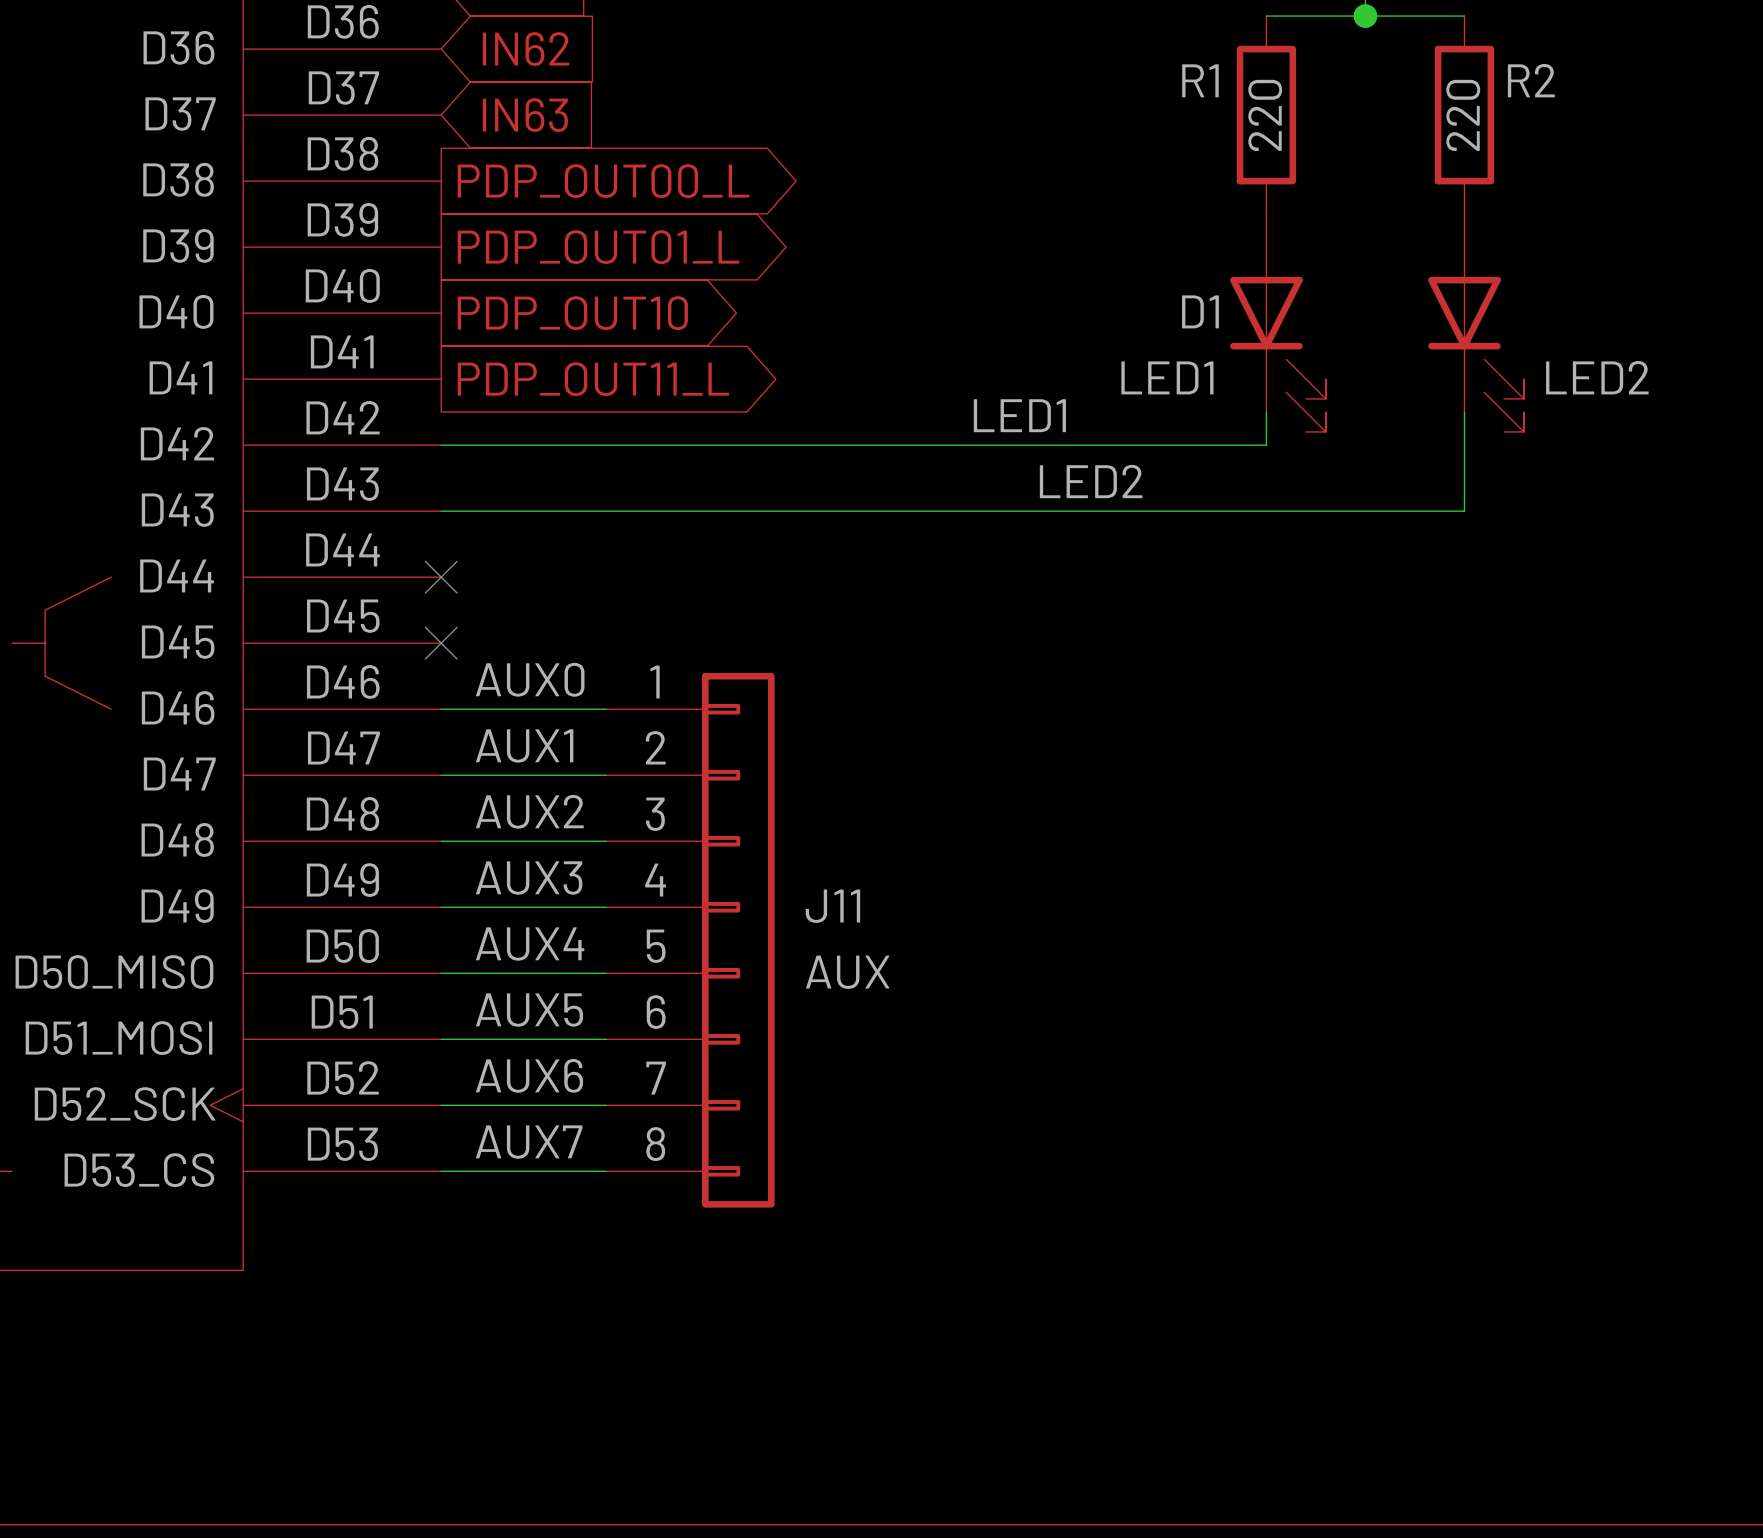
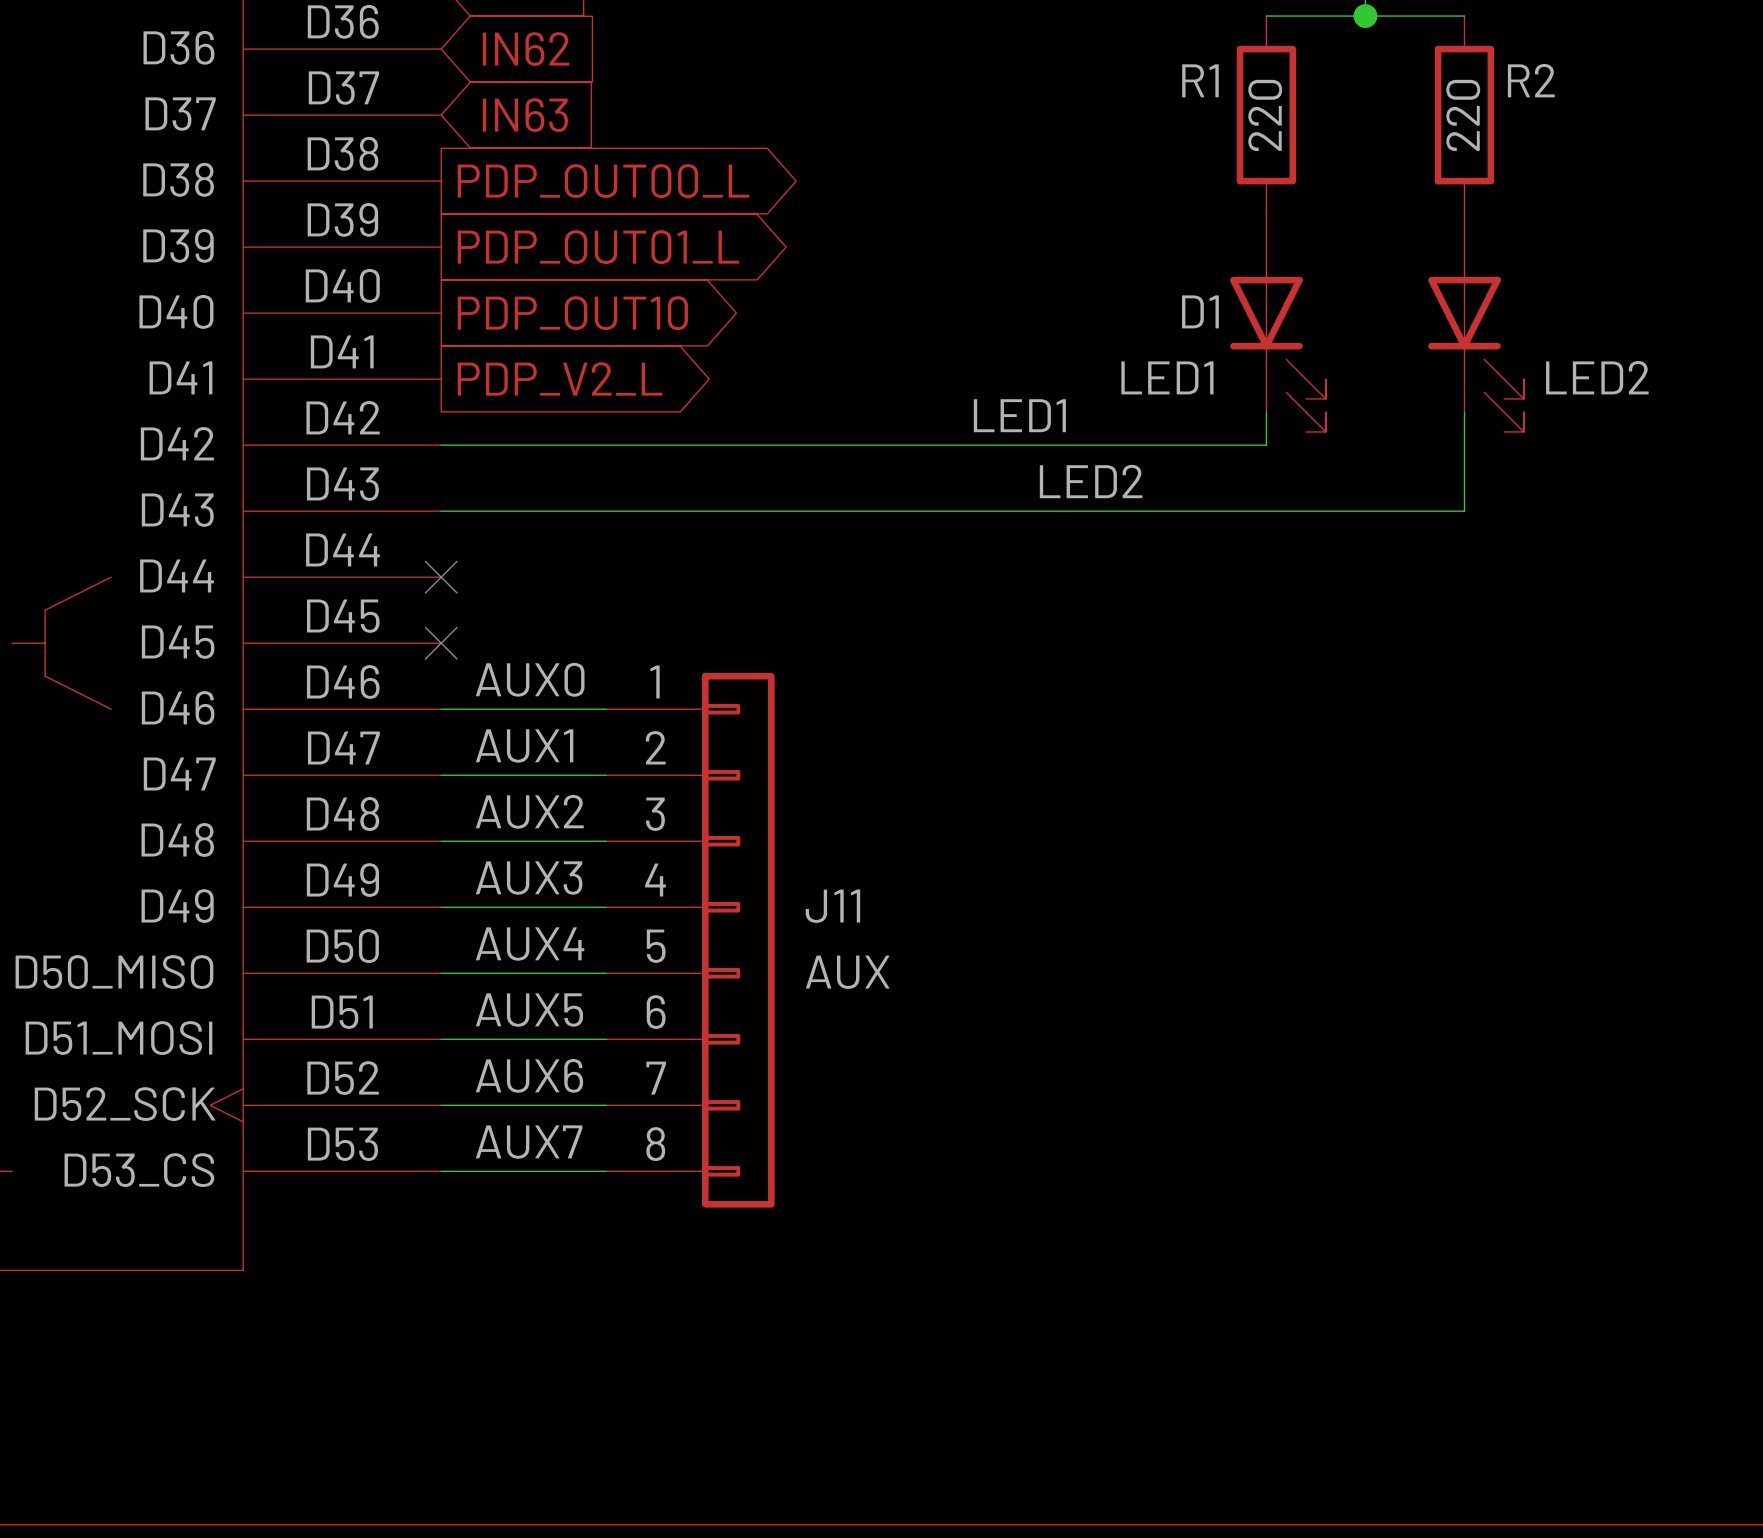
global label: PDP_OUT11_L (593, 379) -> PDP_V2_L (560, 378)

